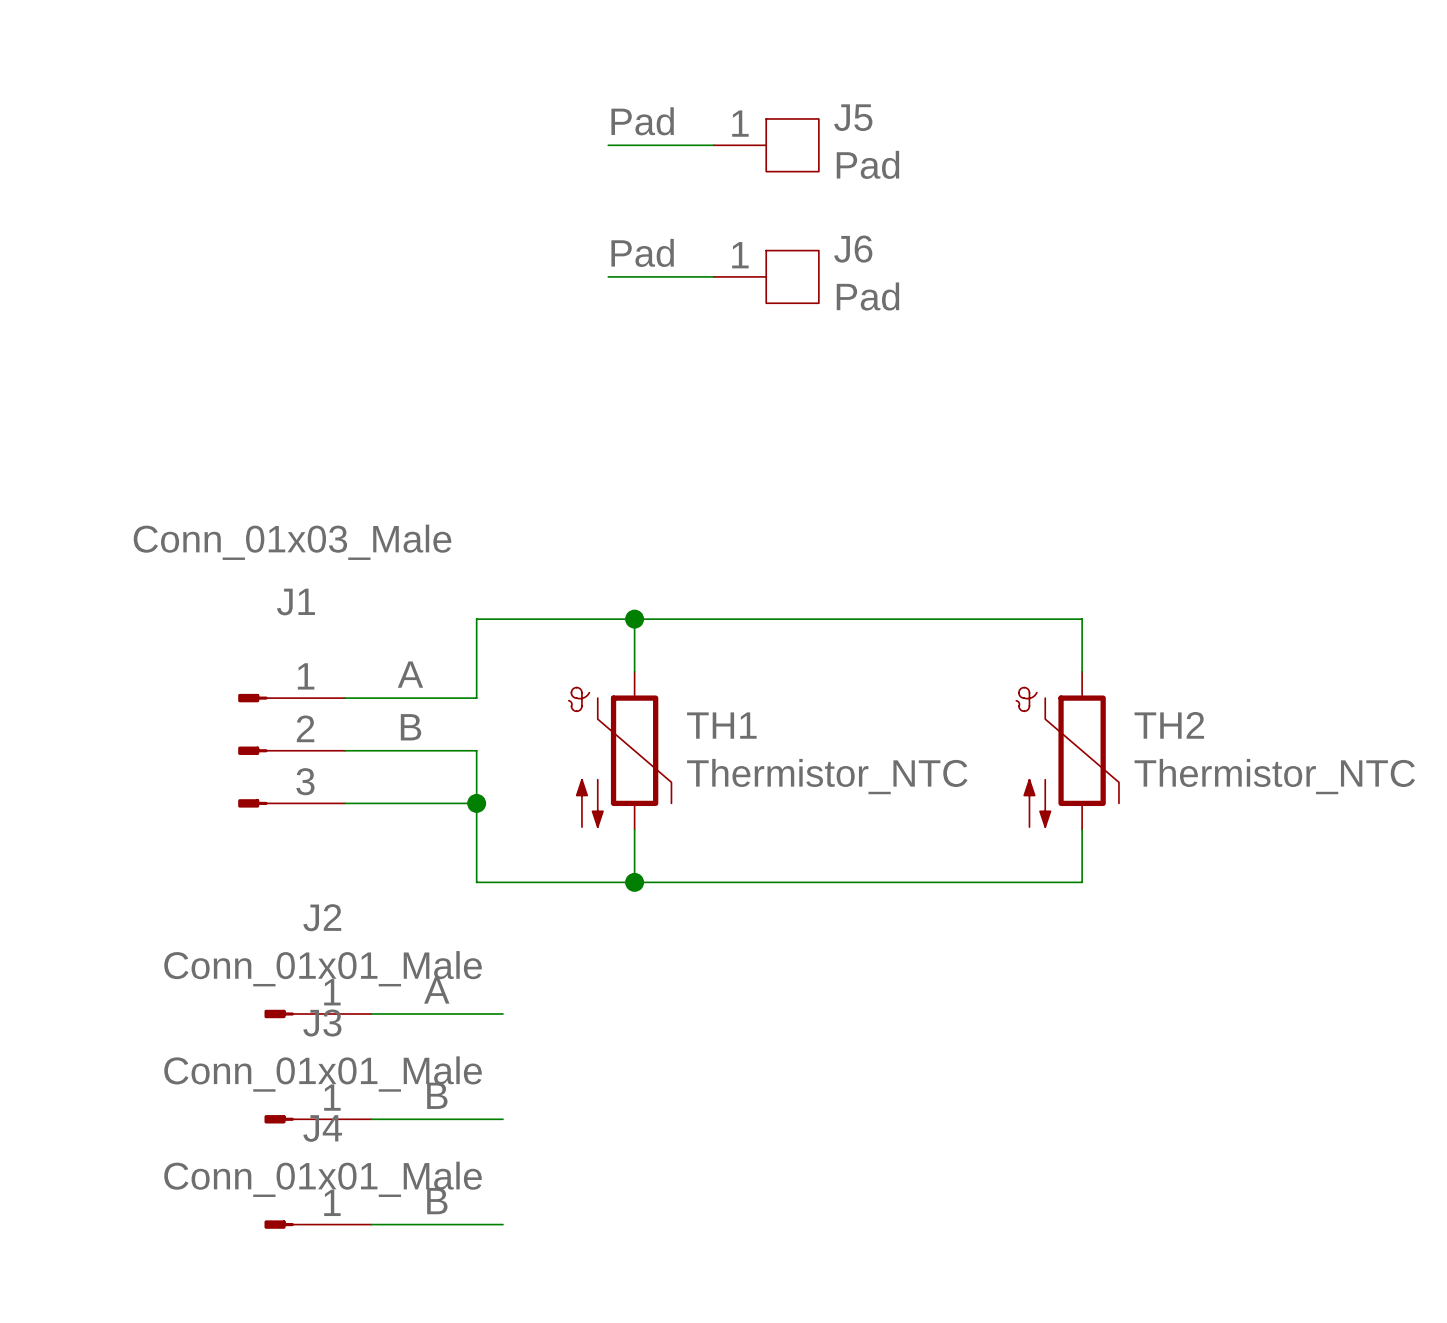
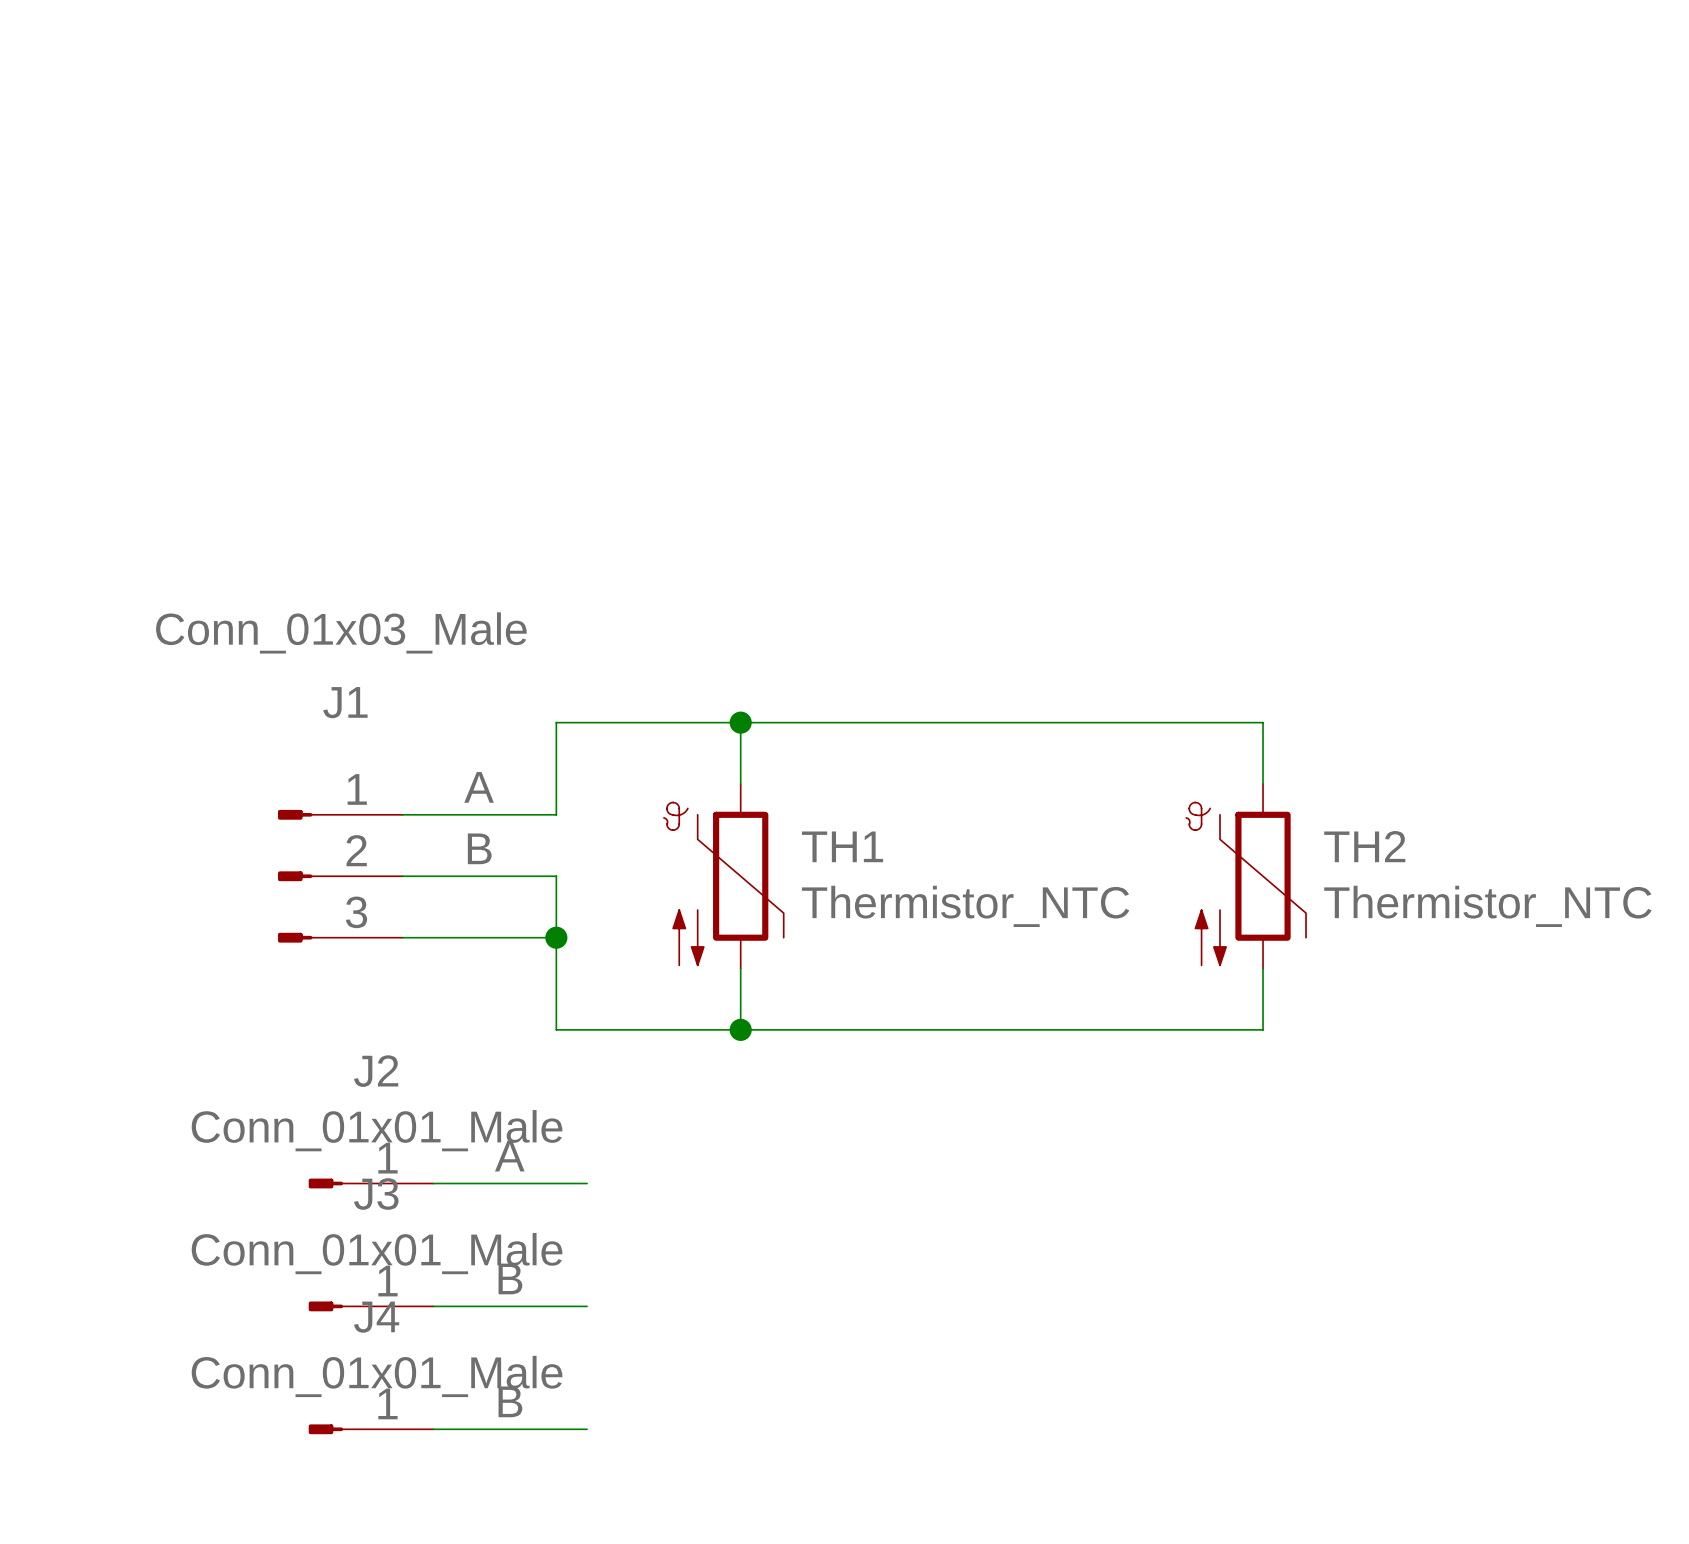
label: Pad (642, 121) -> none
wire: (608, 145) (713, 145) -> none
J5: Pad (766, 145) -> none
label: Pad (642, 252) -> none
wire: (608, 276) (713, 276) -> none
J6: Pad (766, 276) -> none

